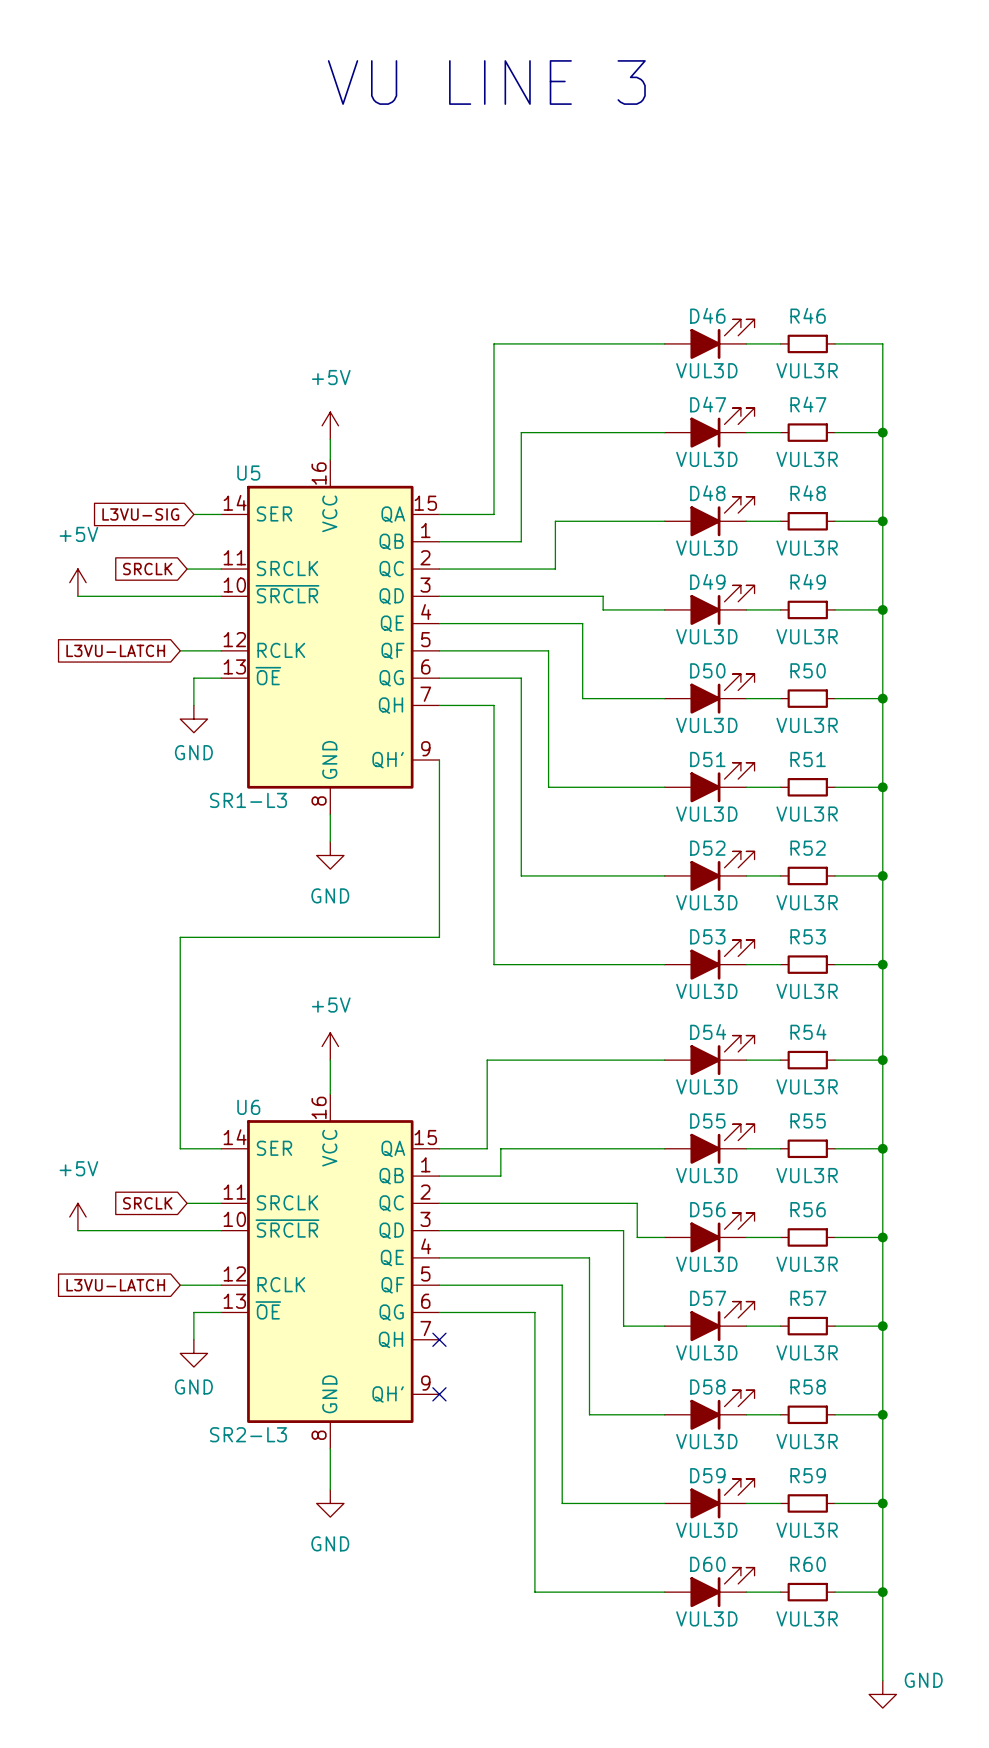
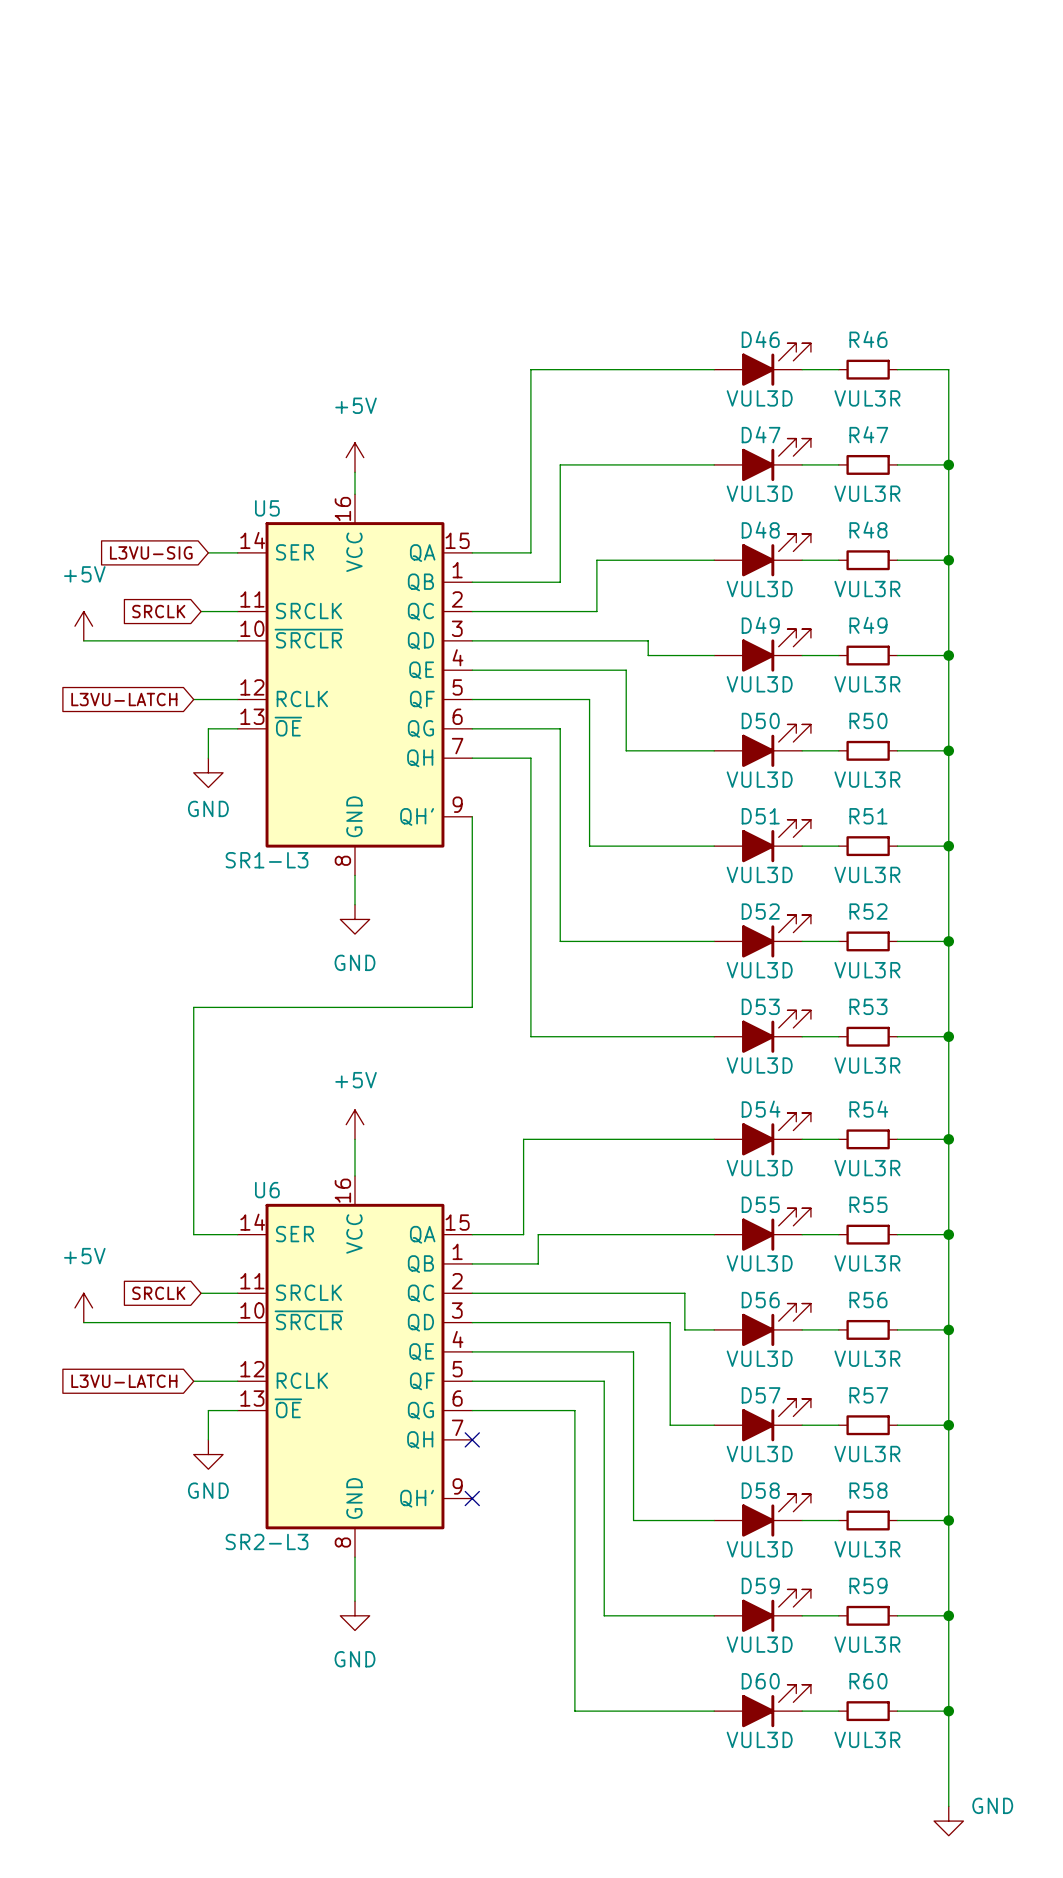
text: VU LINE 3 (486, 82) -> none

